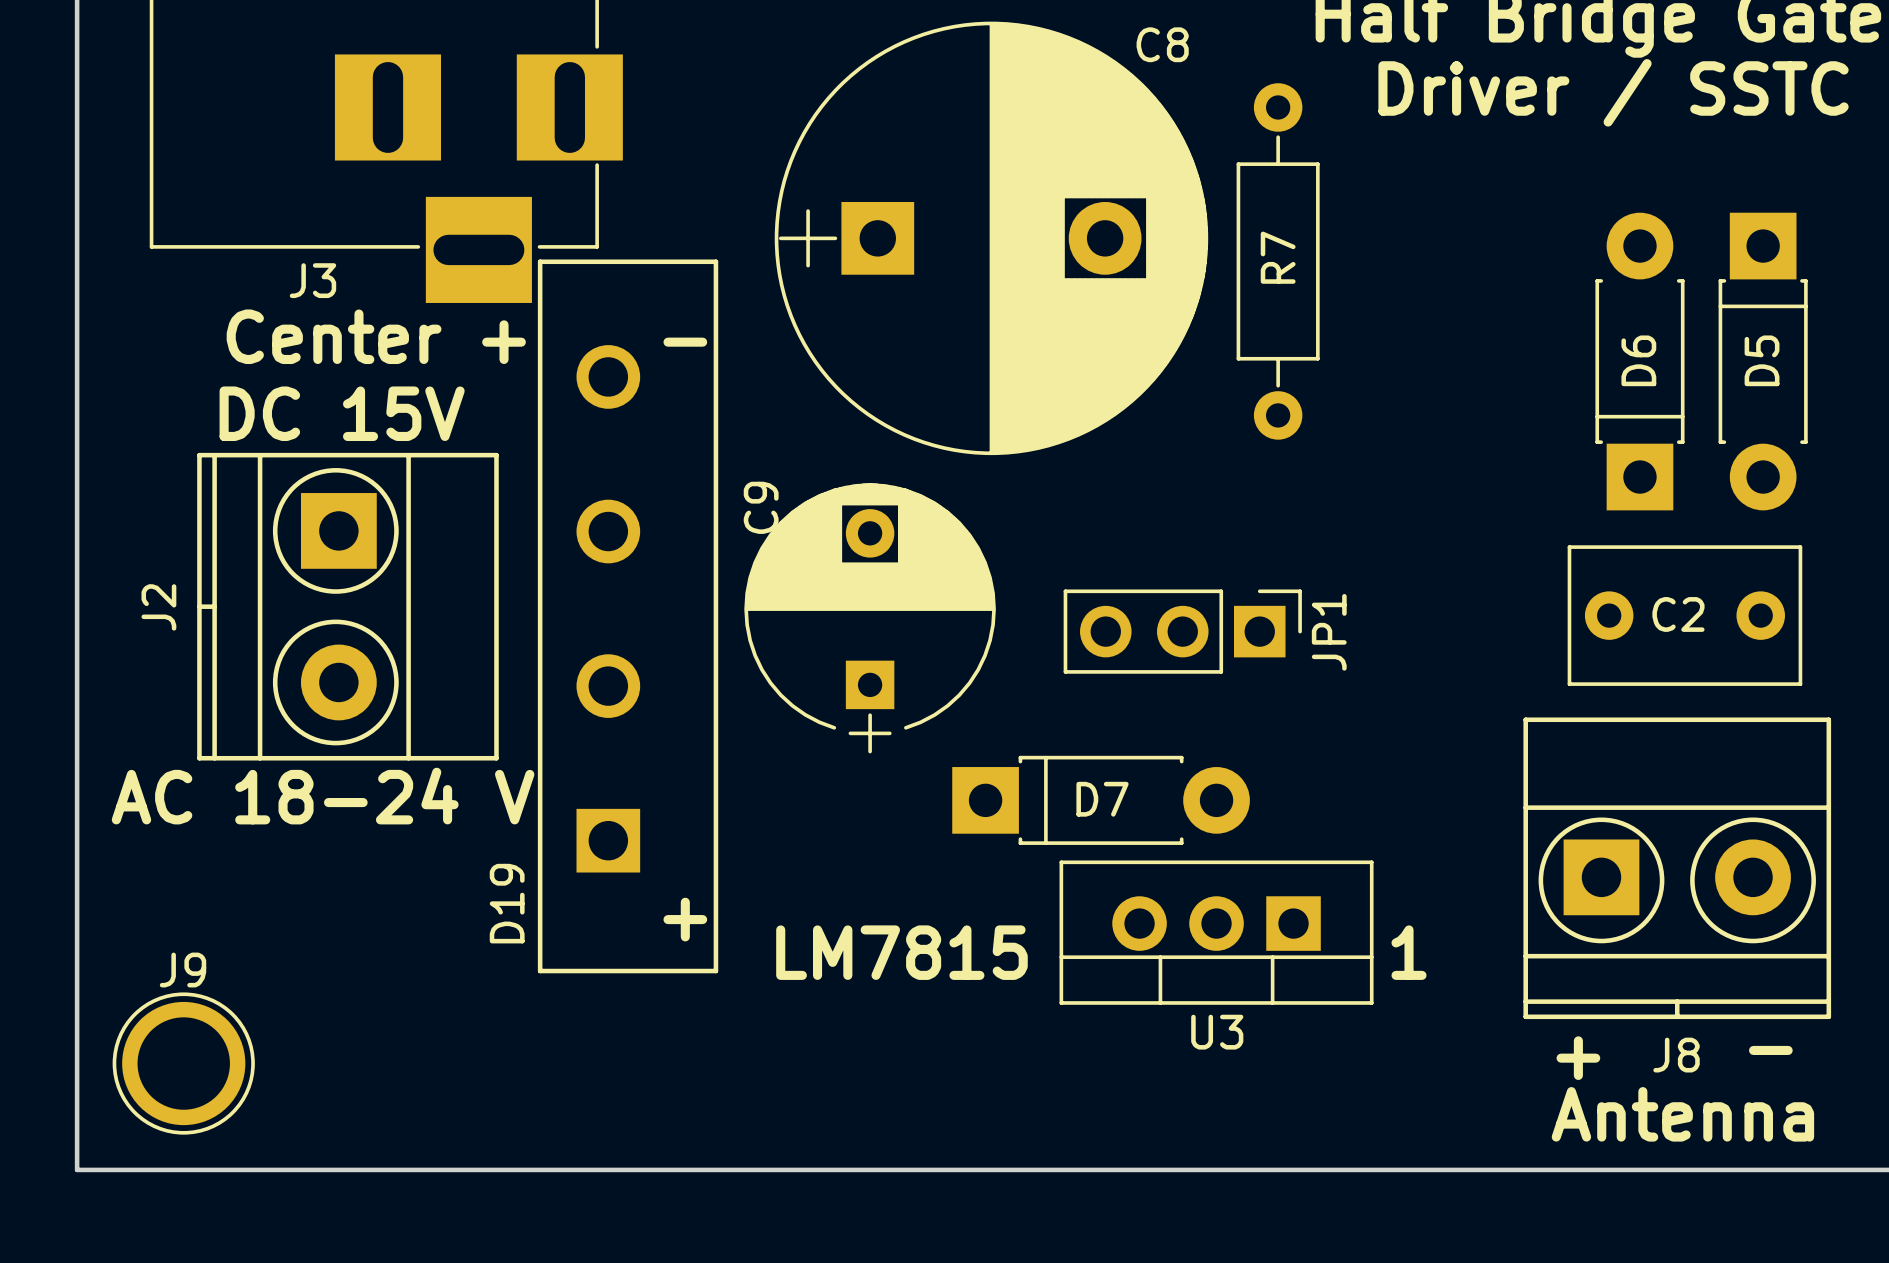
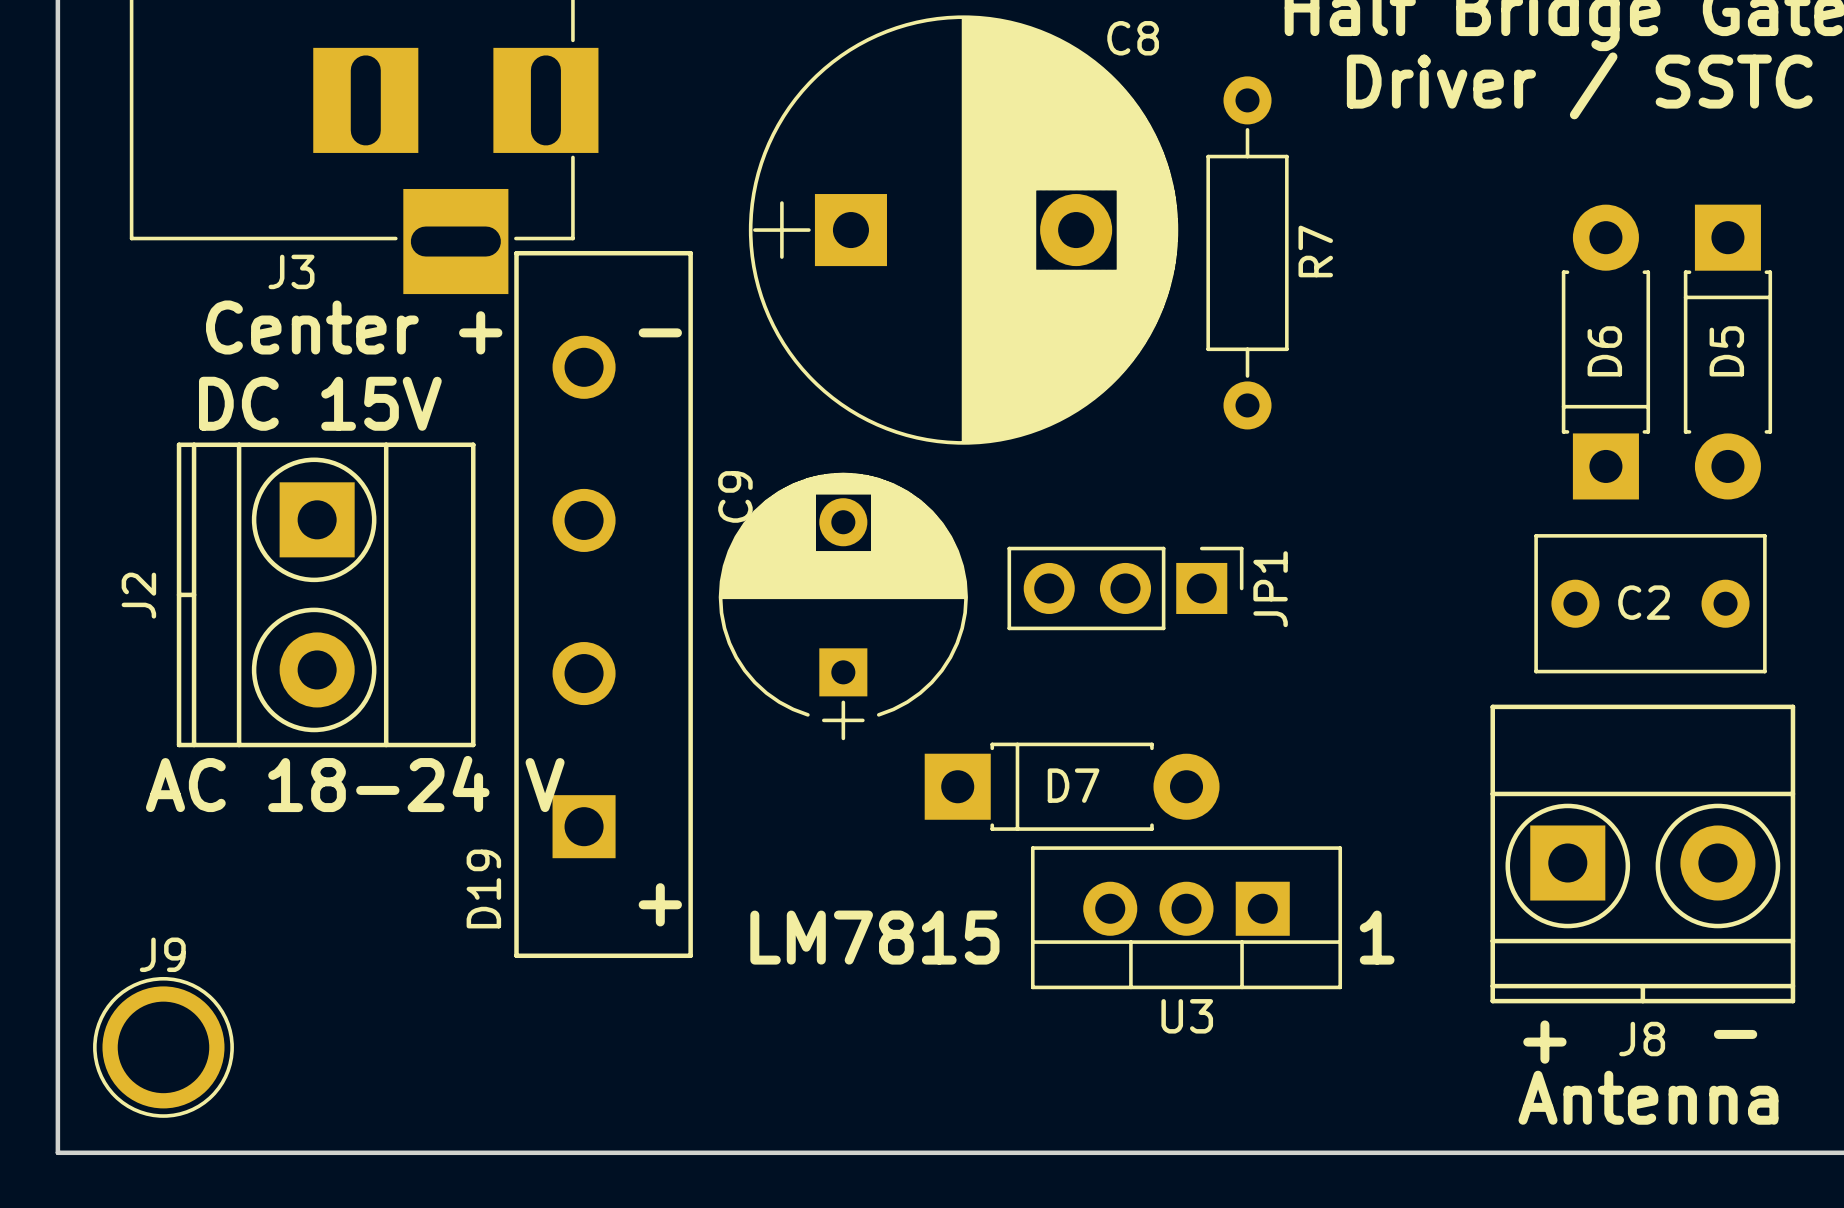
R7 name position: R7 (1278, 257) -> R7 (1315, 251)
JP1 position: (1182, 631) -> (1125, 588)
text position: AC 18-24 V (323, 796) -> AC 18-24 V (355, 783)

